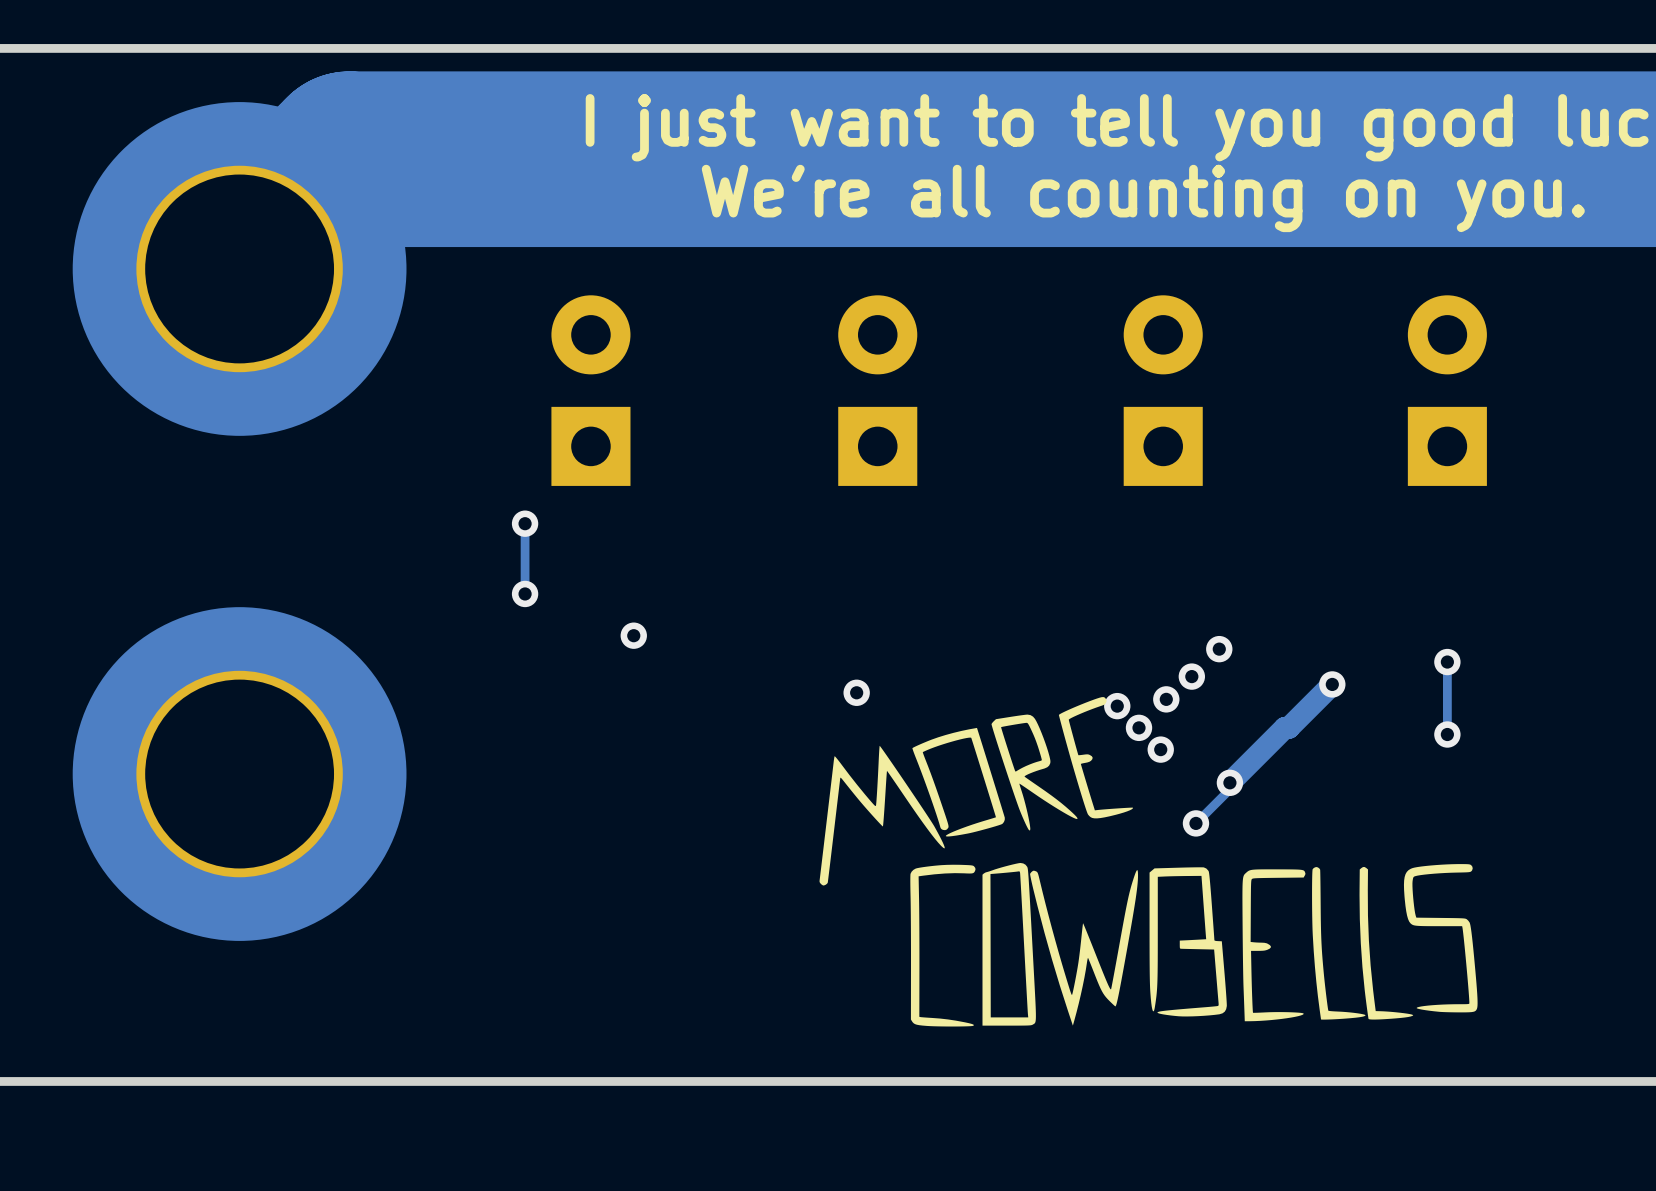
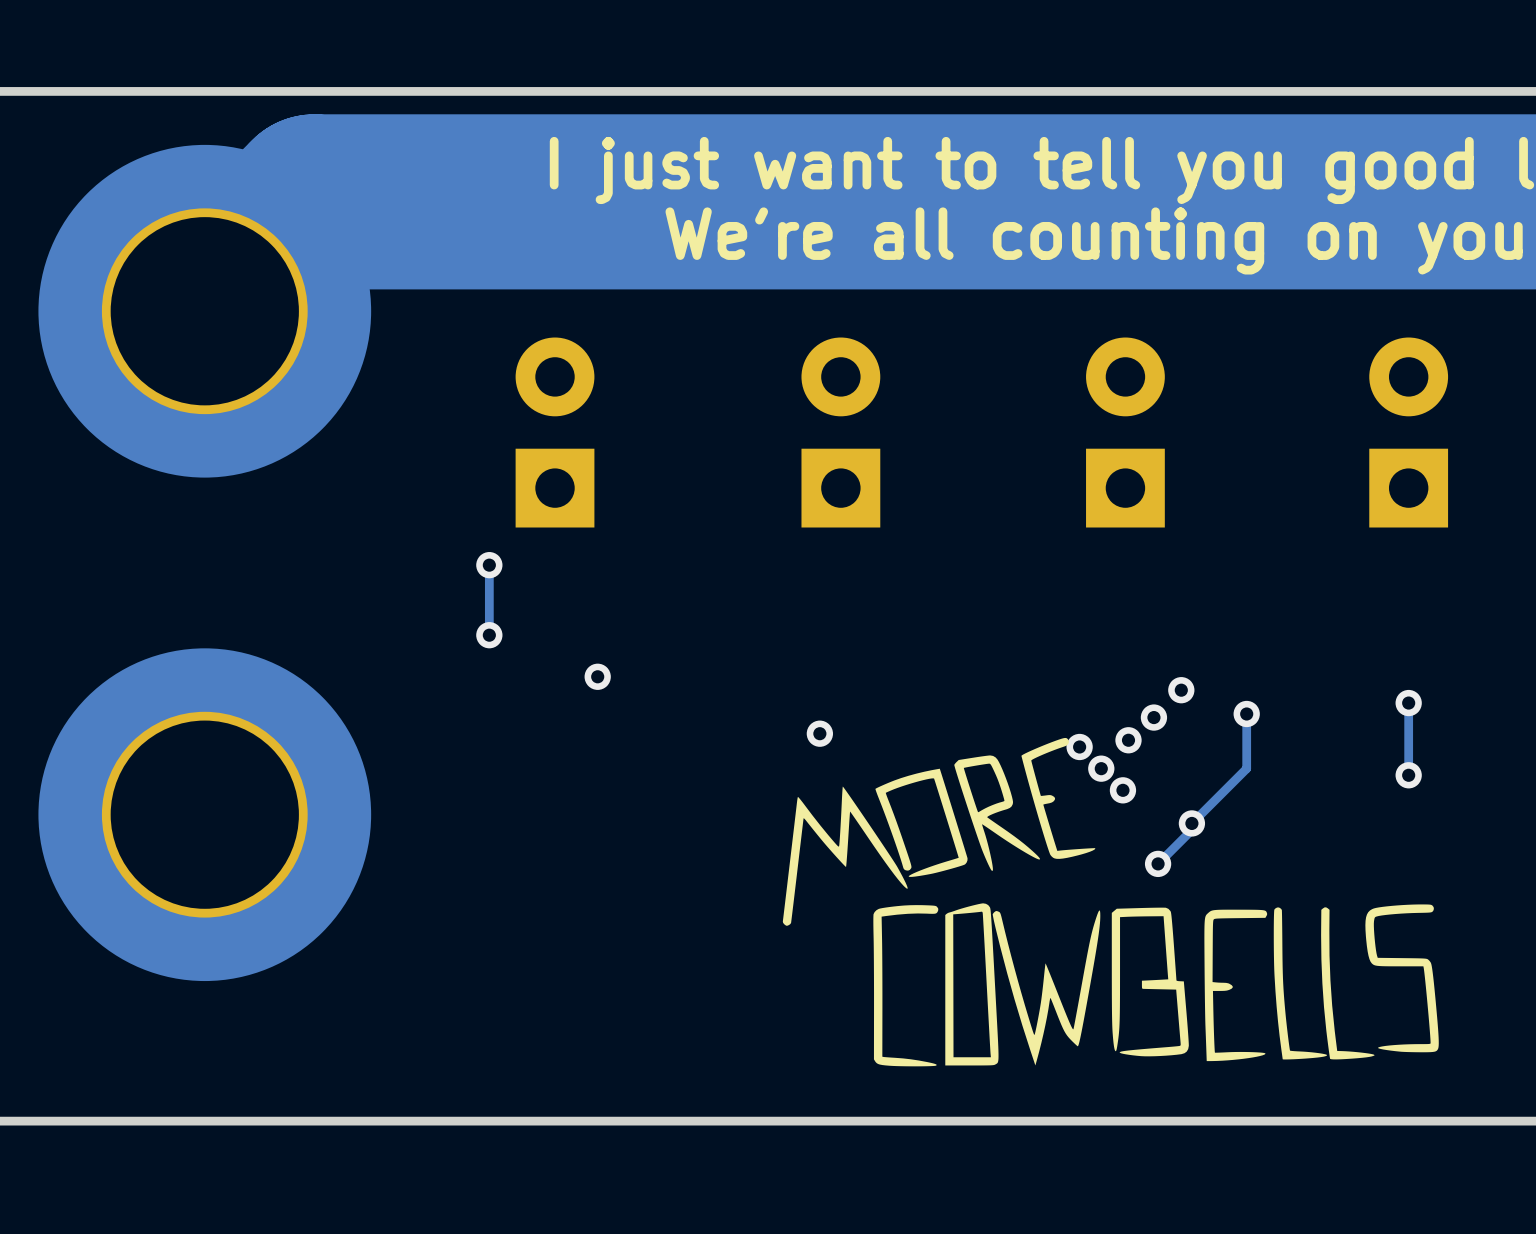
track: (1332, 684) (1288, 727) (1284, 727) -> (1246, 714) (1246, 768)
via position: (1332, 684) -> (1246, 714)
track width: thick (1284, 727) (1229, 782) -> thin (1246, 768) (1191, 823)

